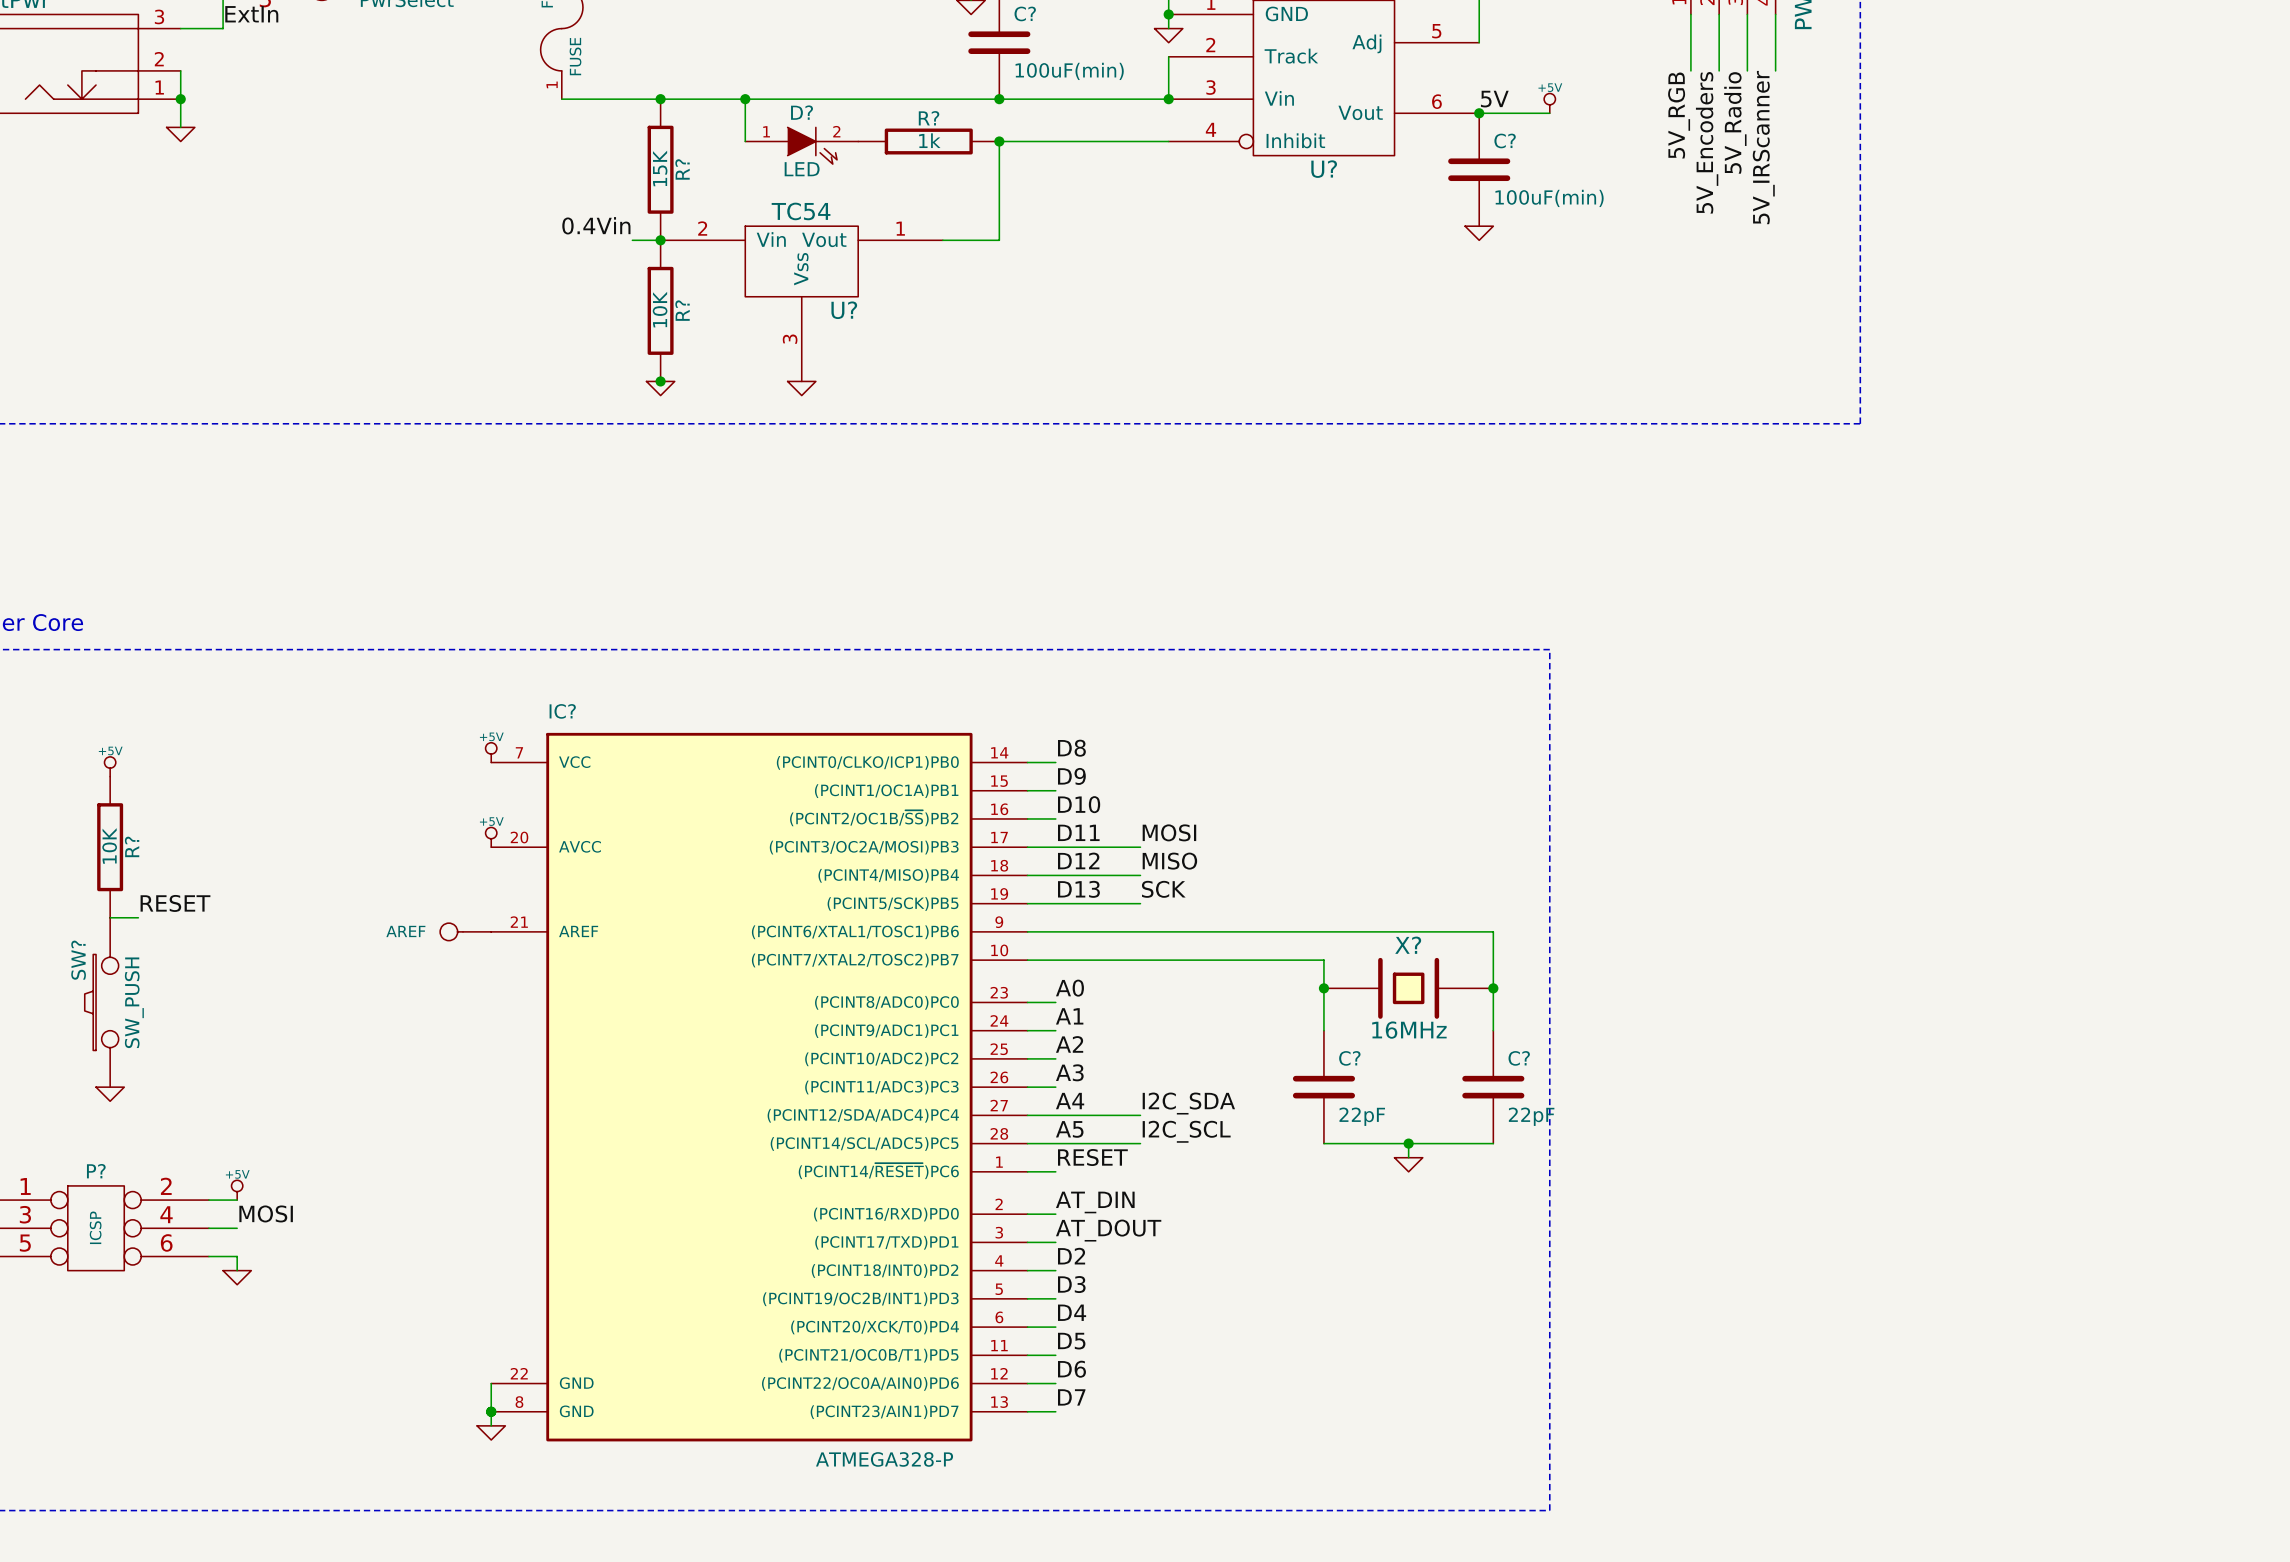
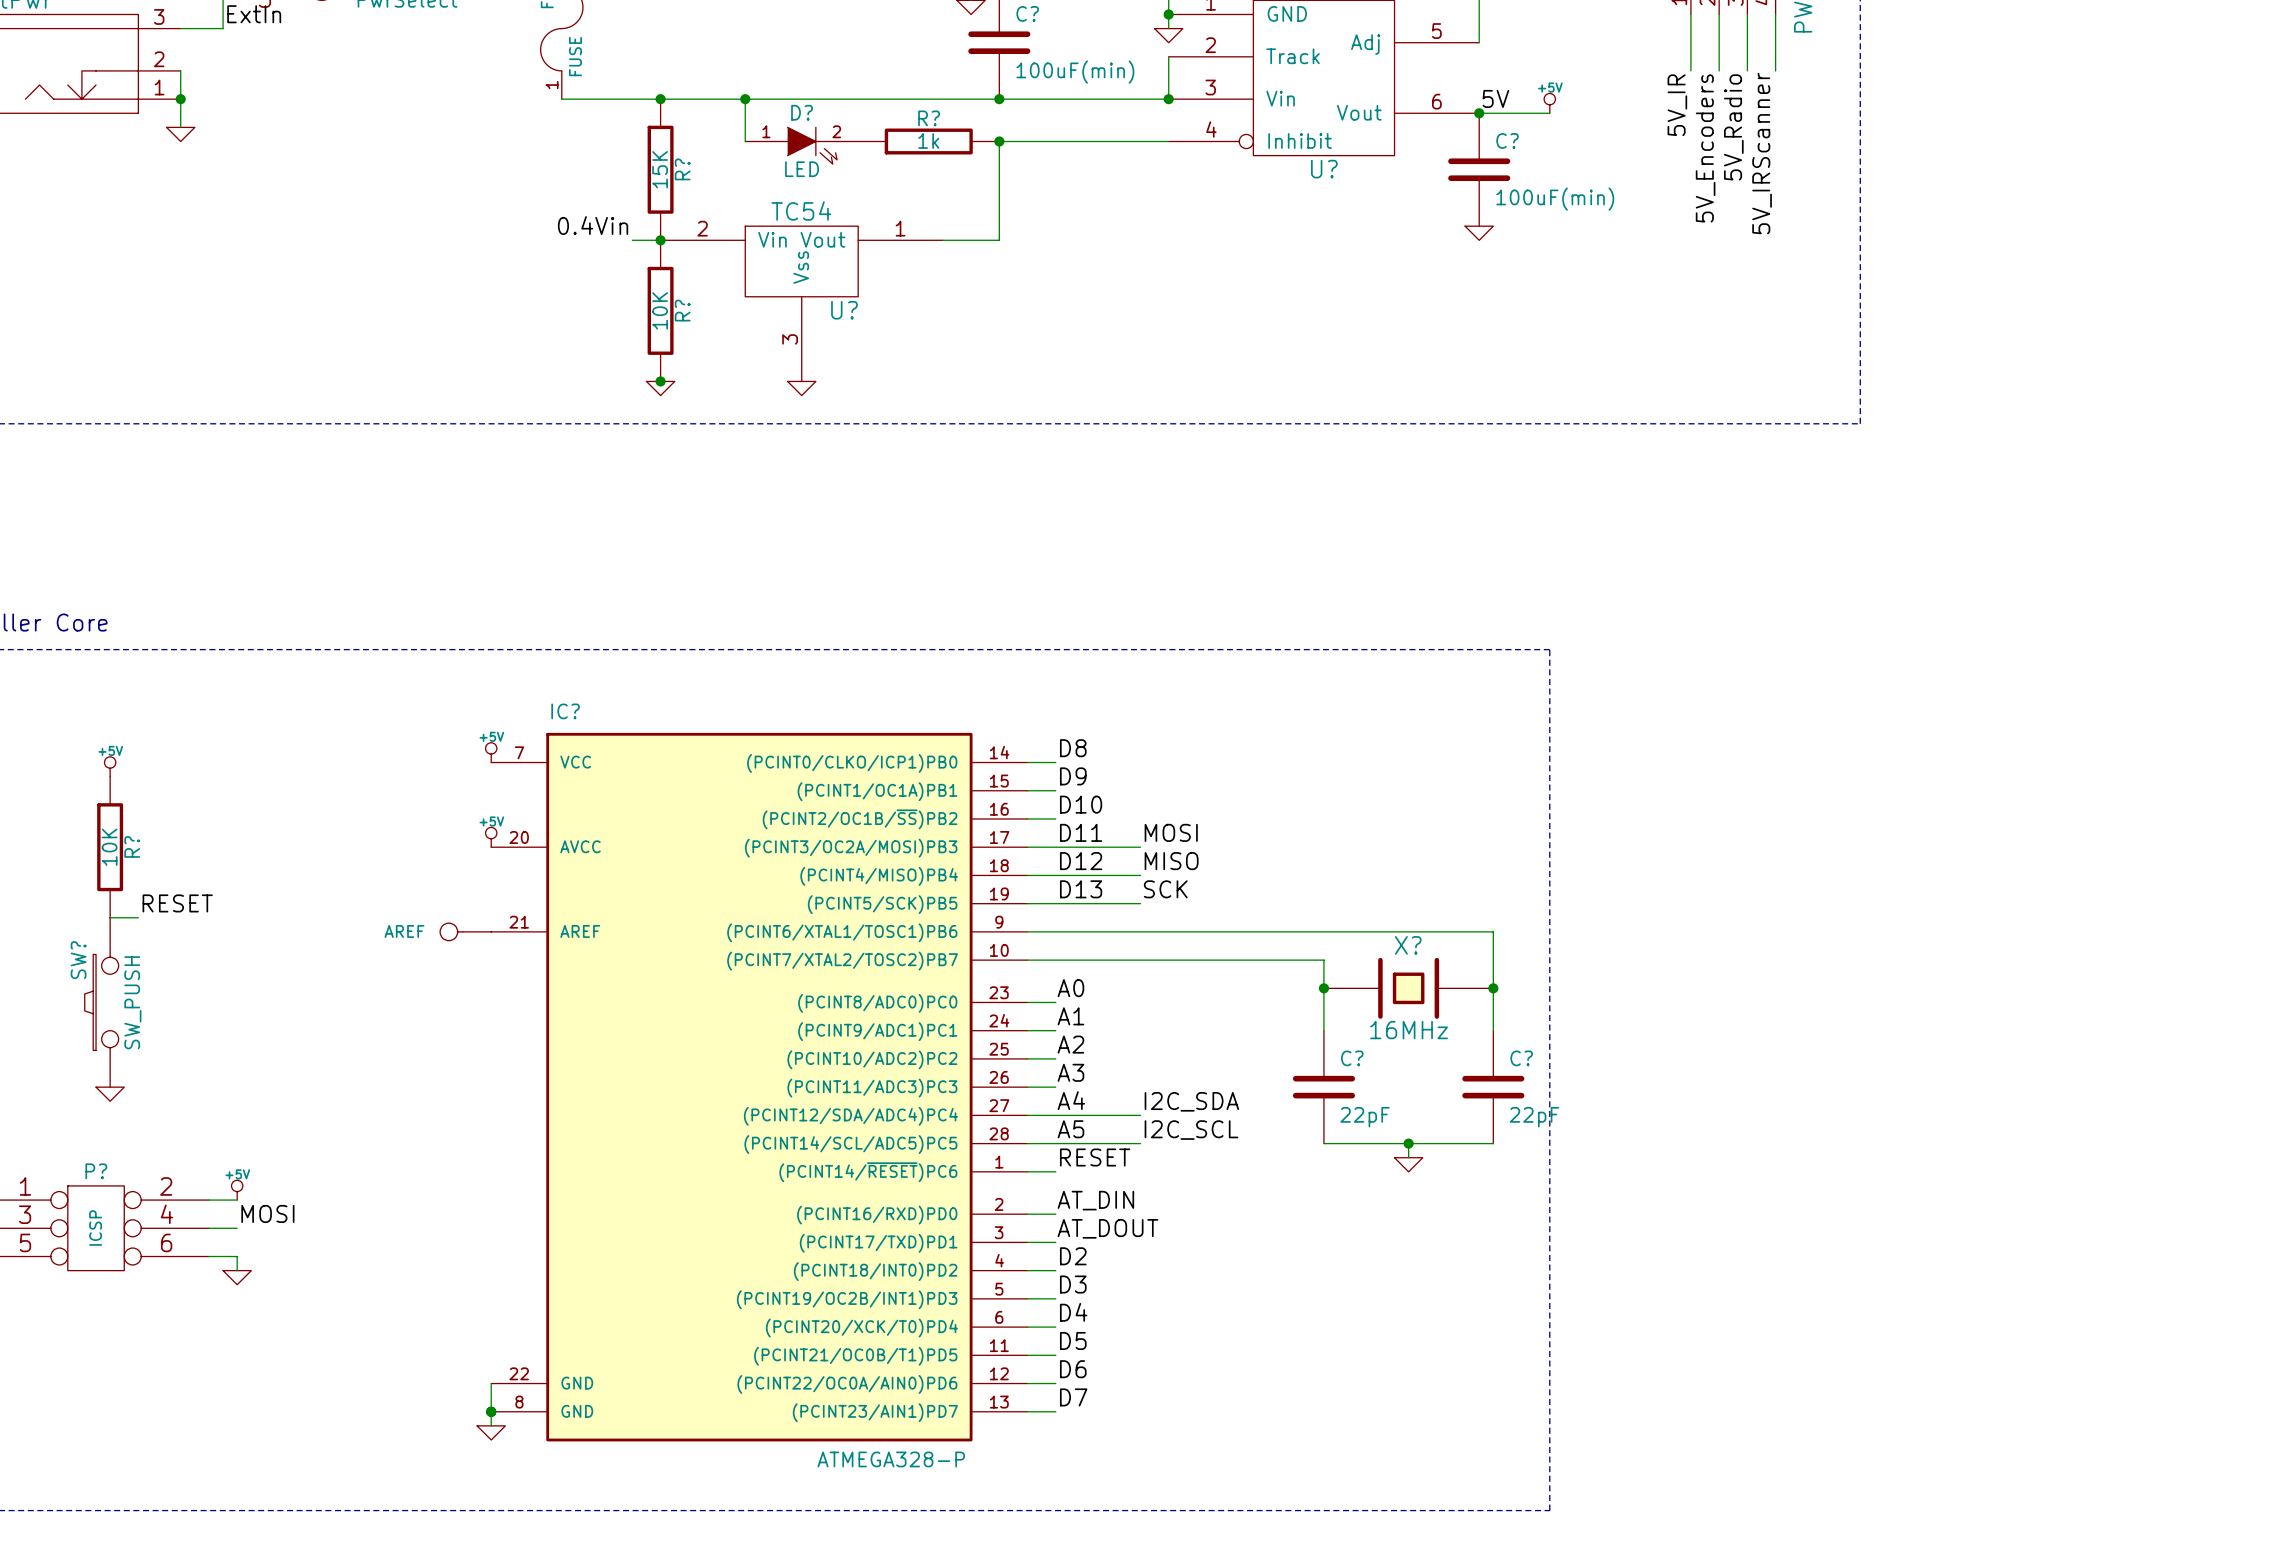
label: 5V_RGB (1679, 115) -> 5V_IR (1677, 105)

